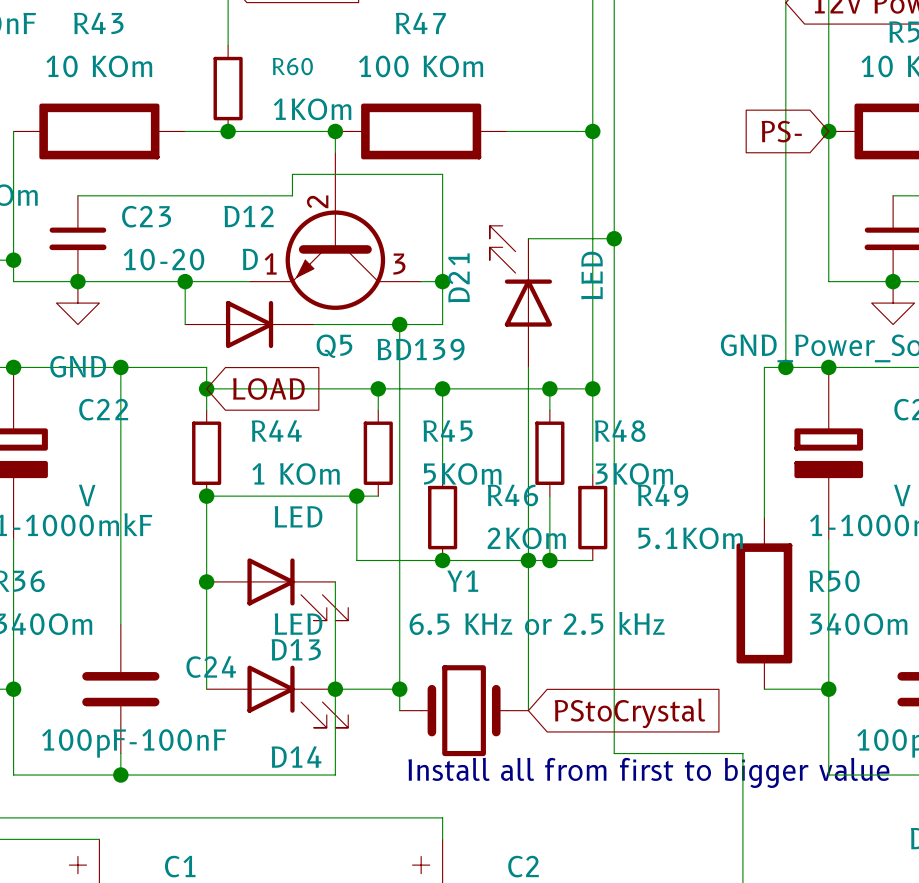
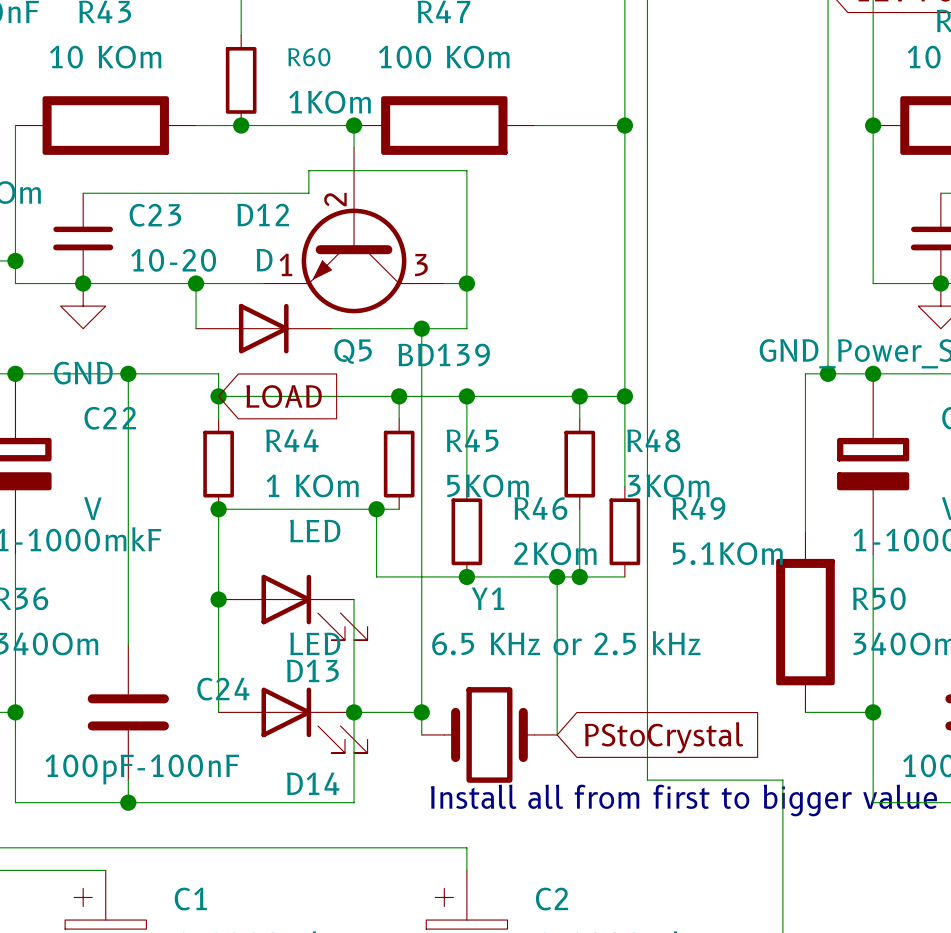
global label: PS- (781, 131) -> none
wire: (528, 238) (614, 238) -> none
junction: (614, 238) -> none
D21: LED (520, 296) -> none
wire: (528, 367) (528, 560) -> none

